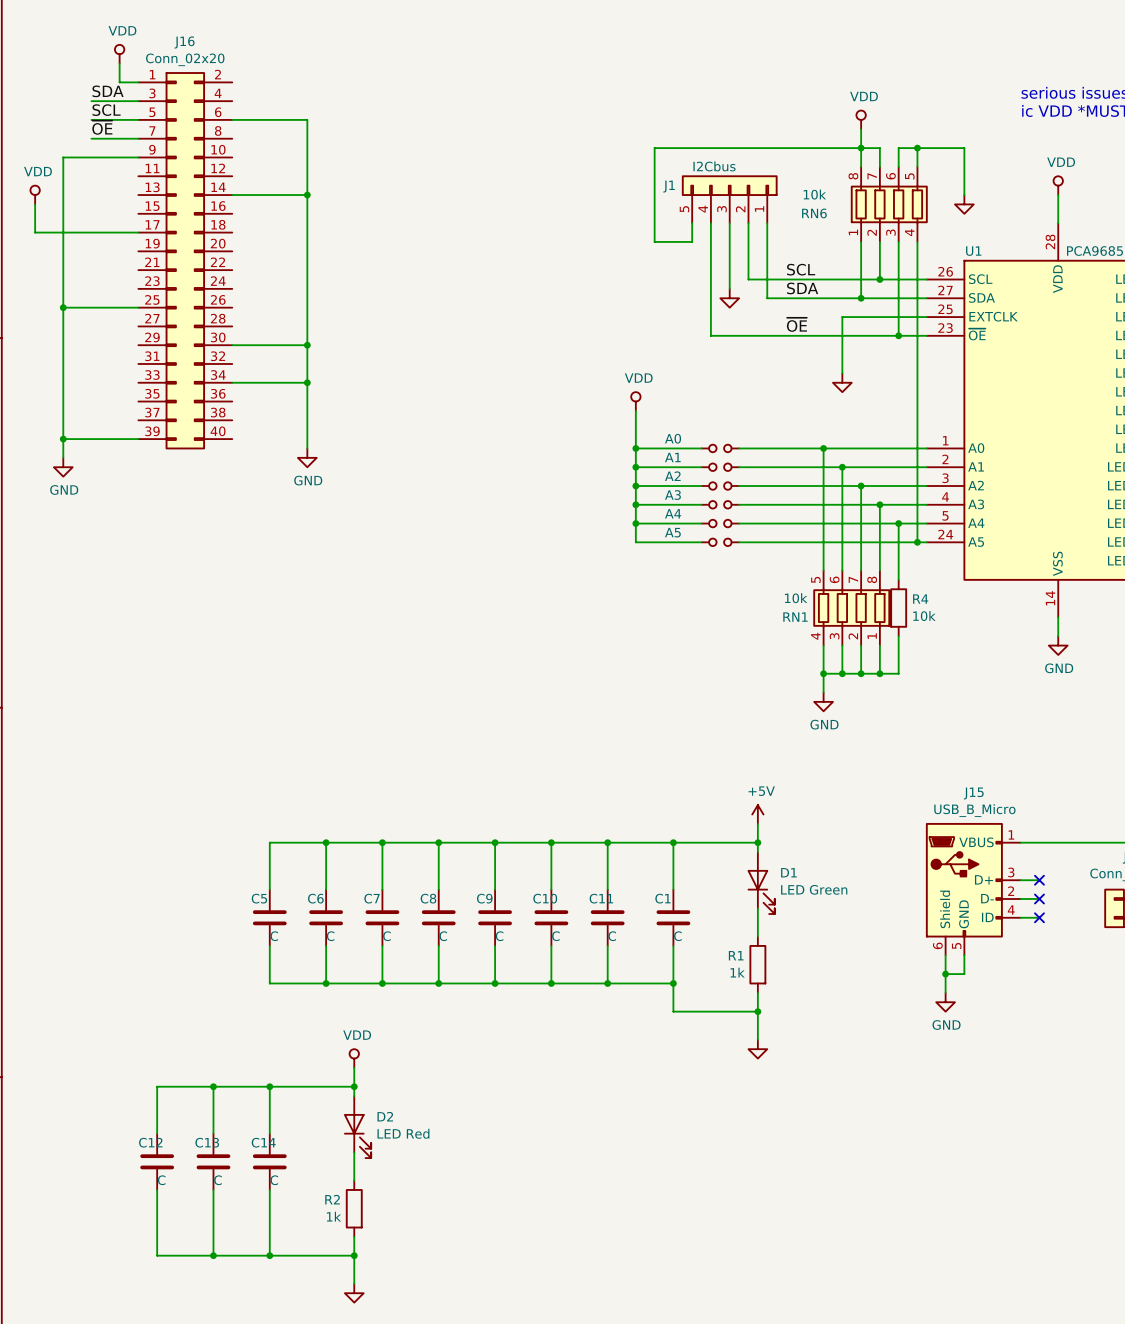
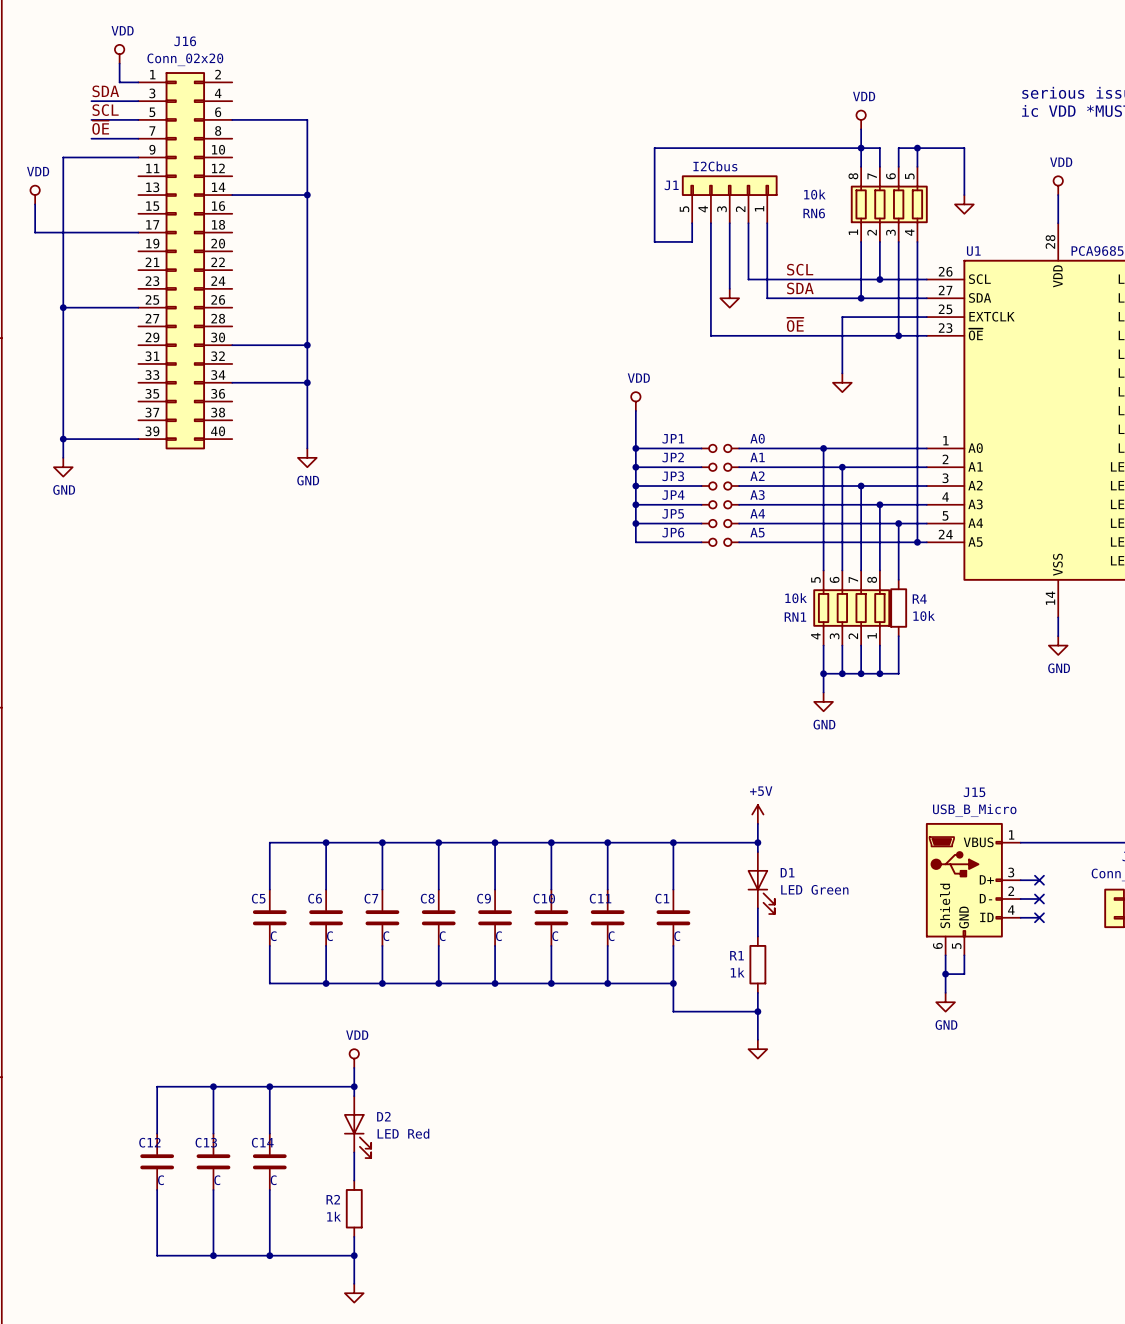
A0 name: A0 (673, 438) -> JP1 (673, 438)
A0 value: none -> A0 (757, 438)
A1 name: A1 (672, 457) -> JP2 (673, 457)
A1 value: none -> A1 (757, 457)
A2 name: A2 (672, 476) -> JP3 (673, 476)
A2 value: none -> A2 (757, 476)
A3 name: A3 (672, 495) -> JP4 (673, 495)
A3 value: none -> A3 (757, 495)
A4 name: A4 (673, 513) -> JP5 (673, 513)
A4 value: none -> A4 (757, 513)
A5 name: A5 (672, 532) -> JP6 (673, 532)
A5 value: none -> A5 (757, 532)

